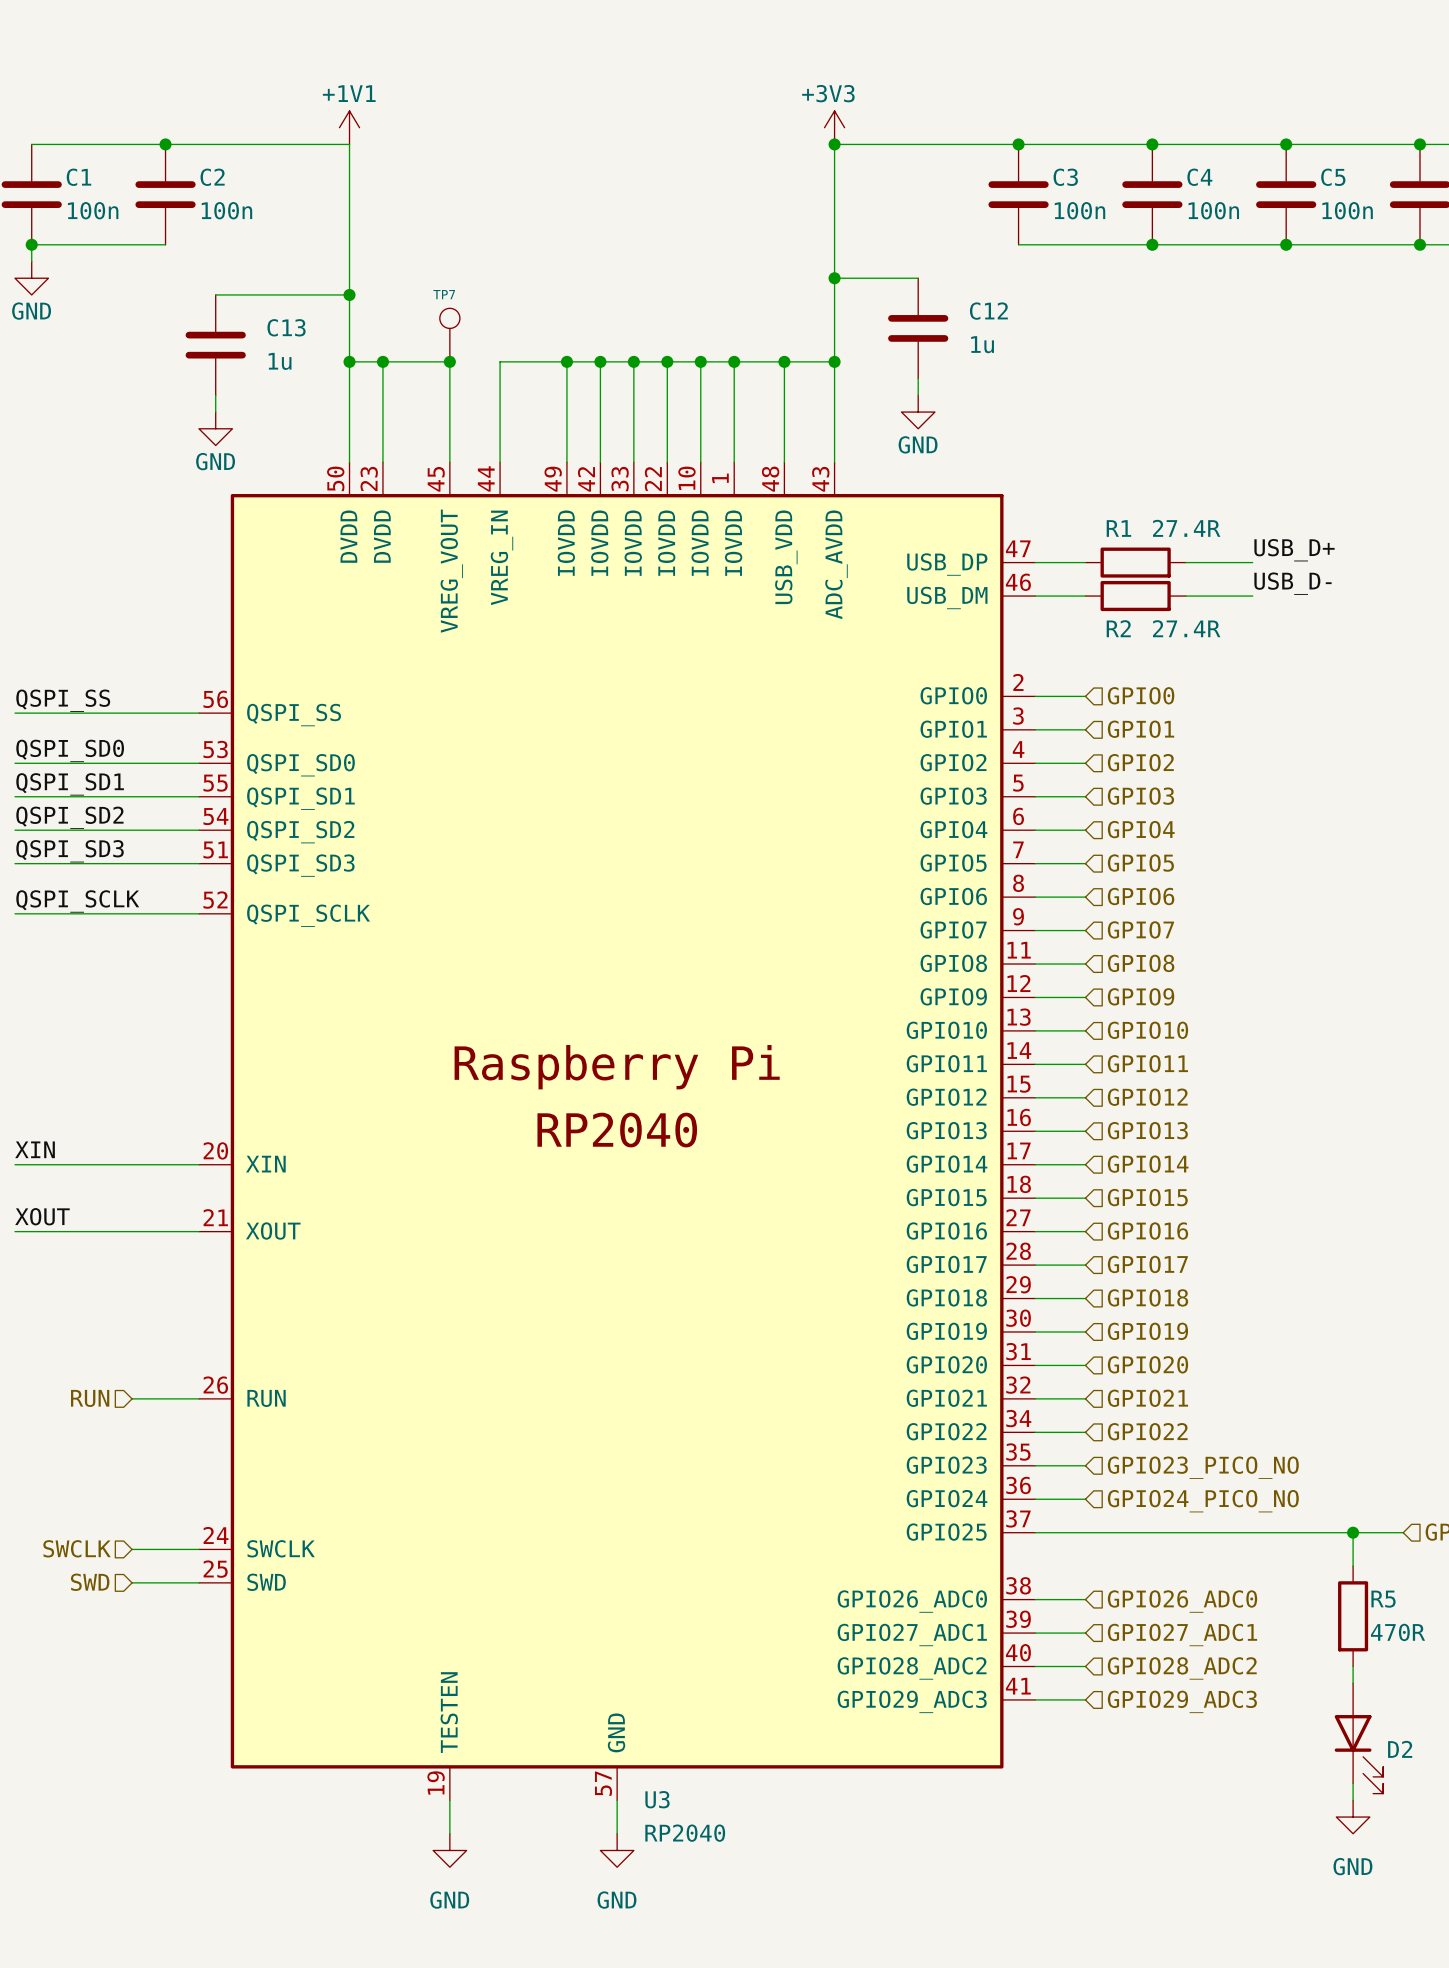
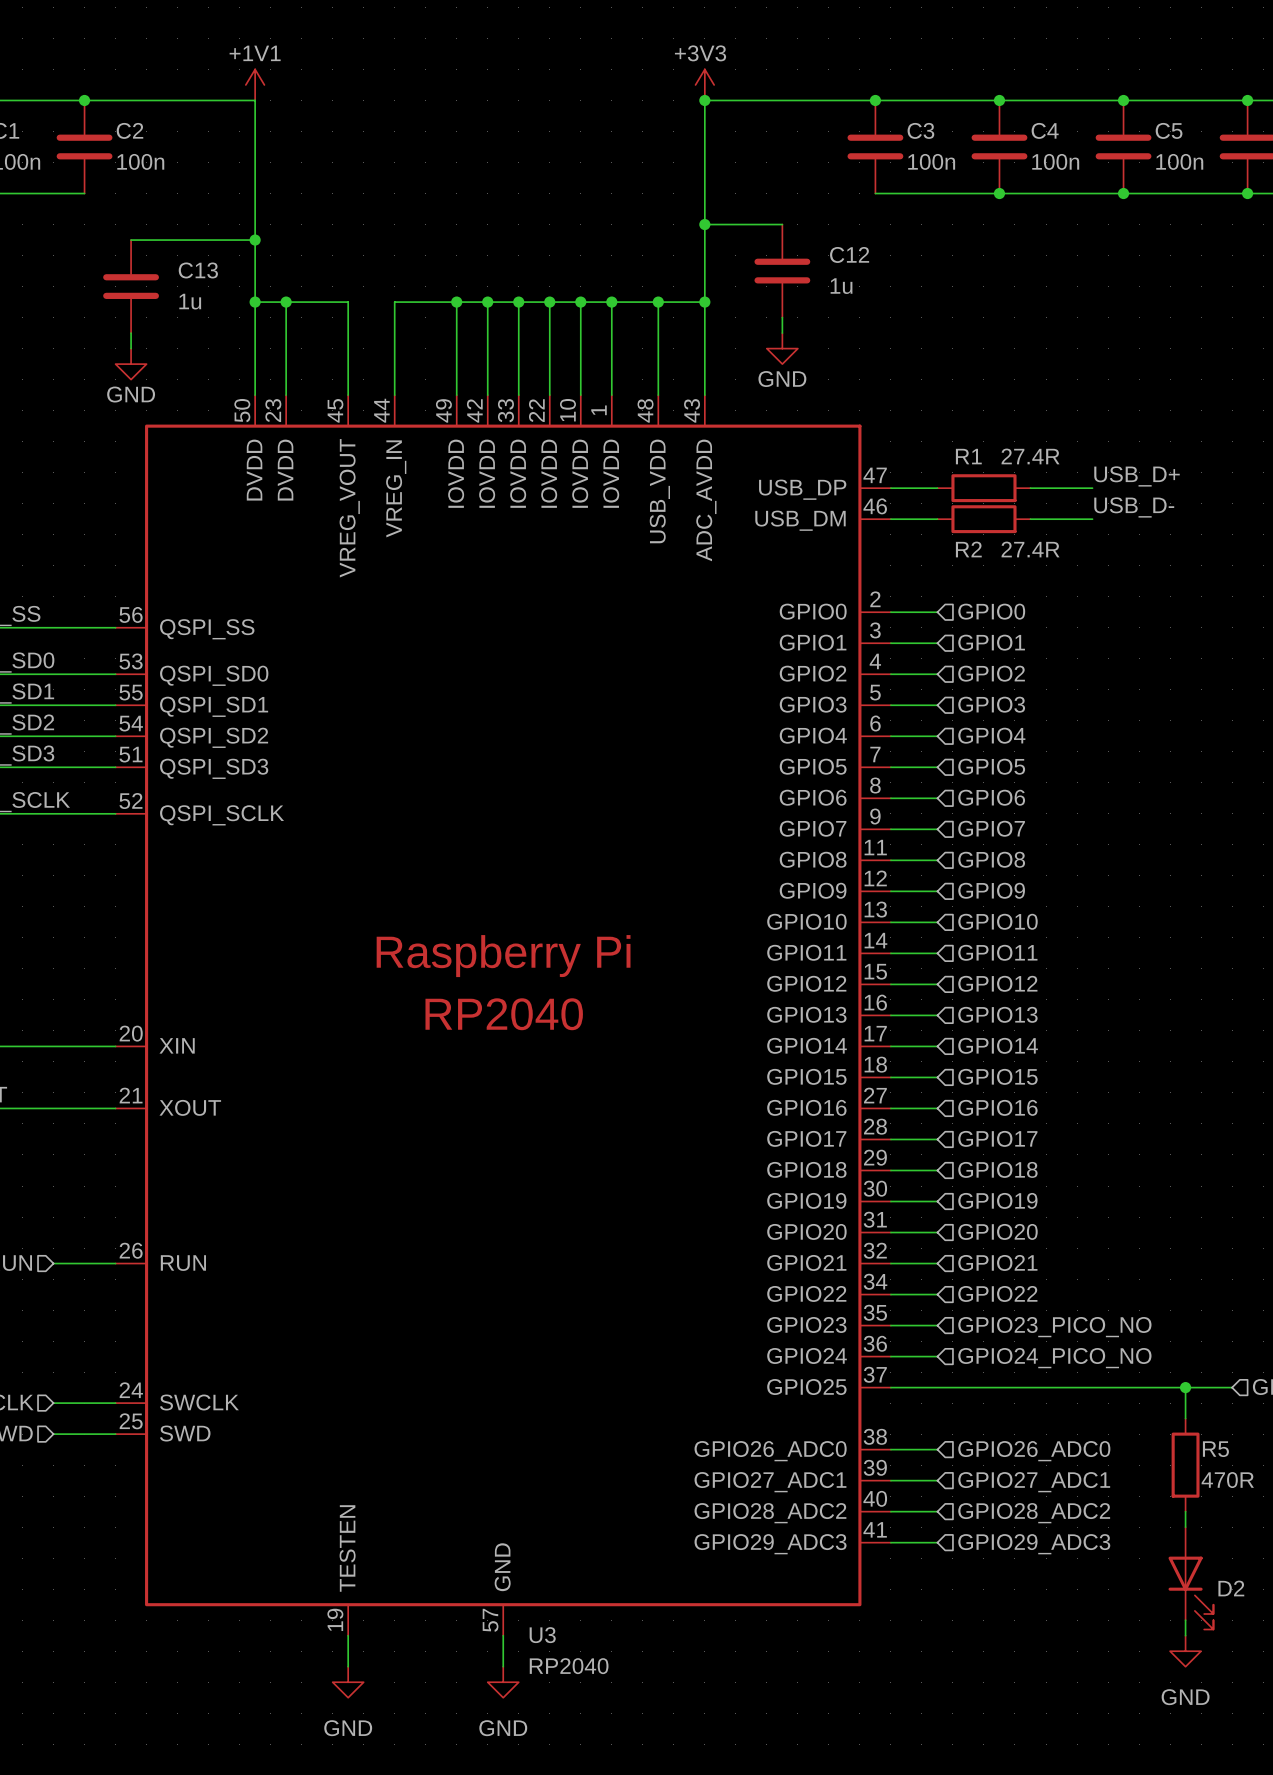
TP7: (449, 335) -> none
junction: (449, 361) -> none

